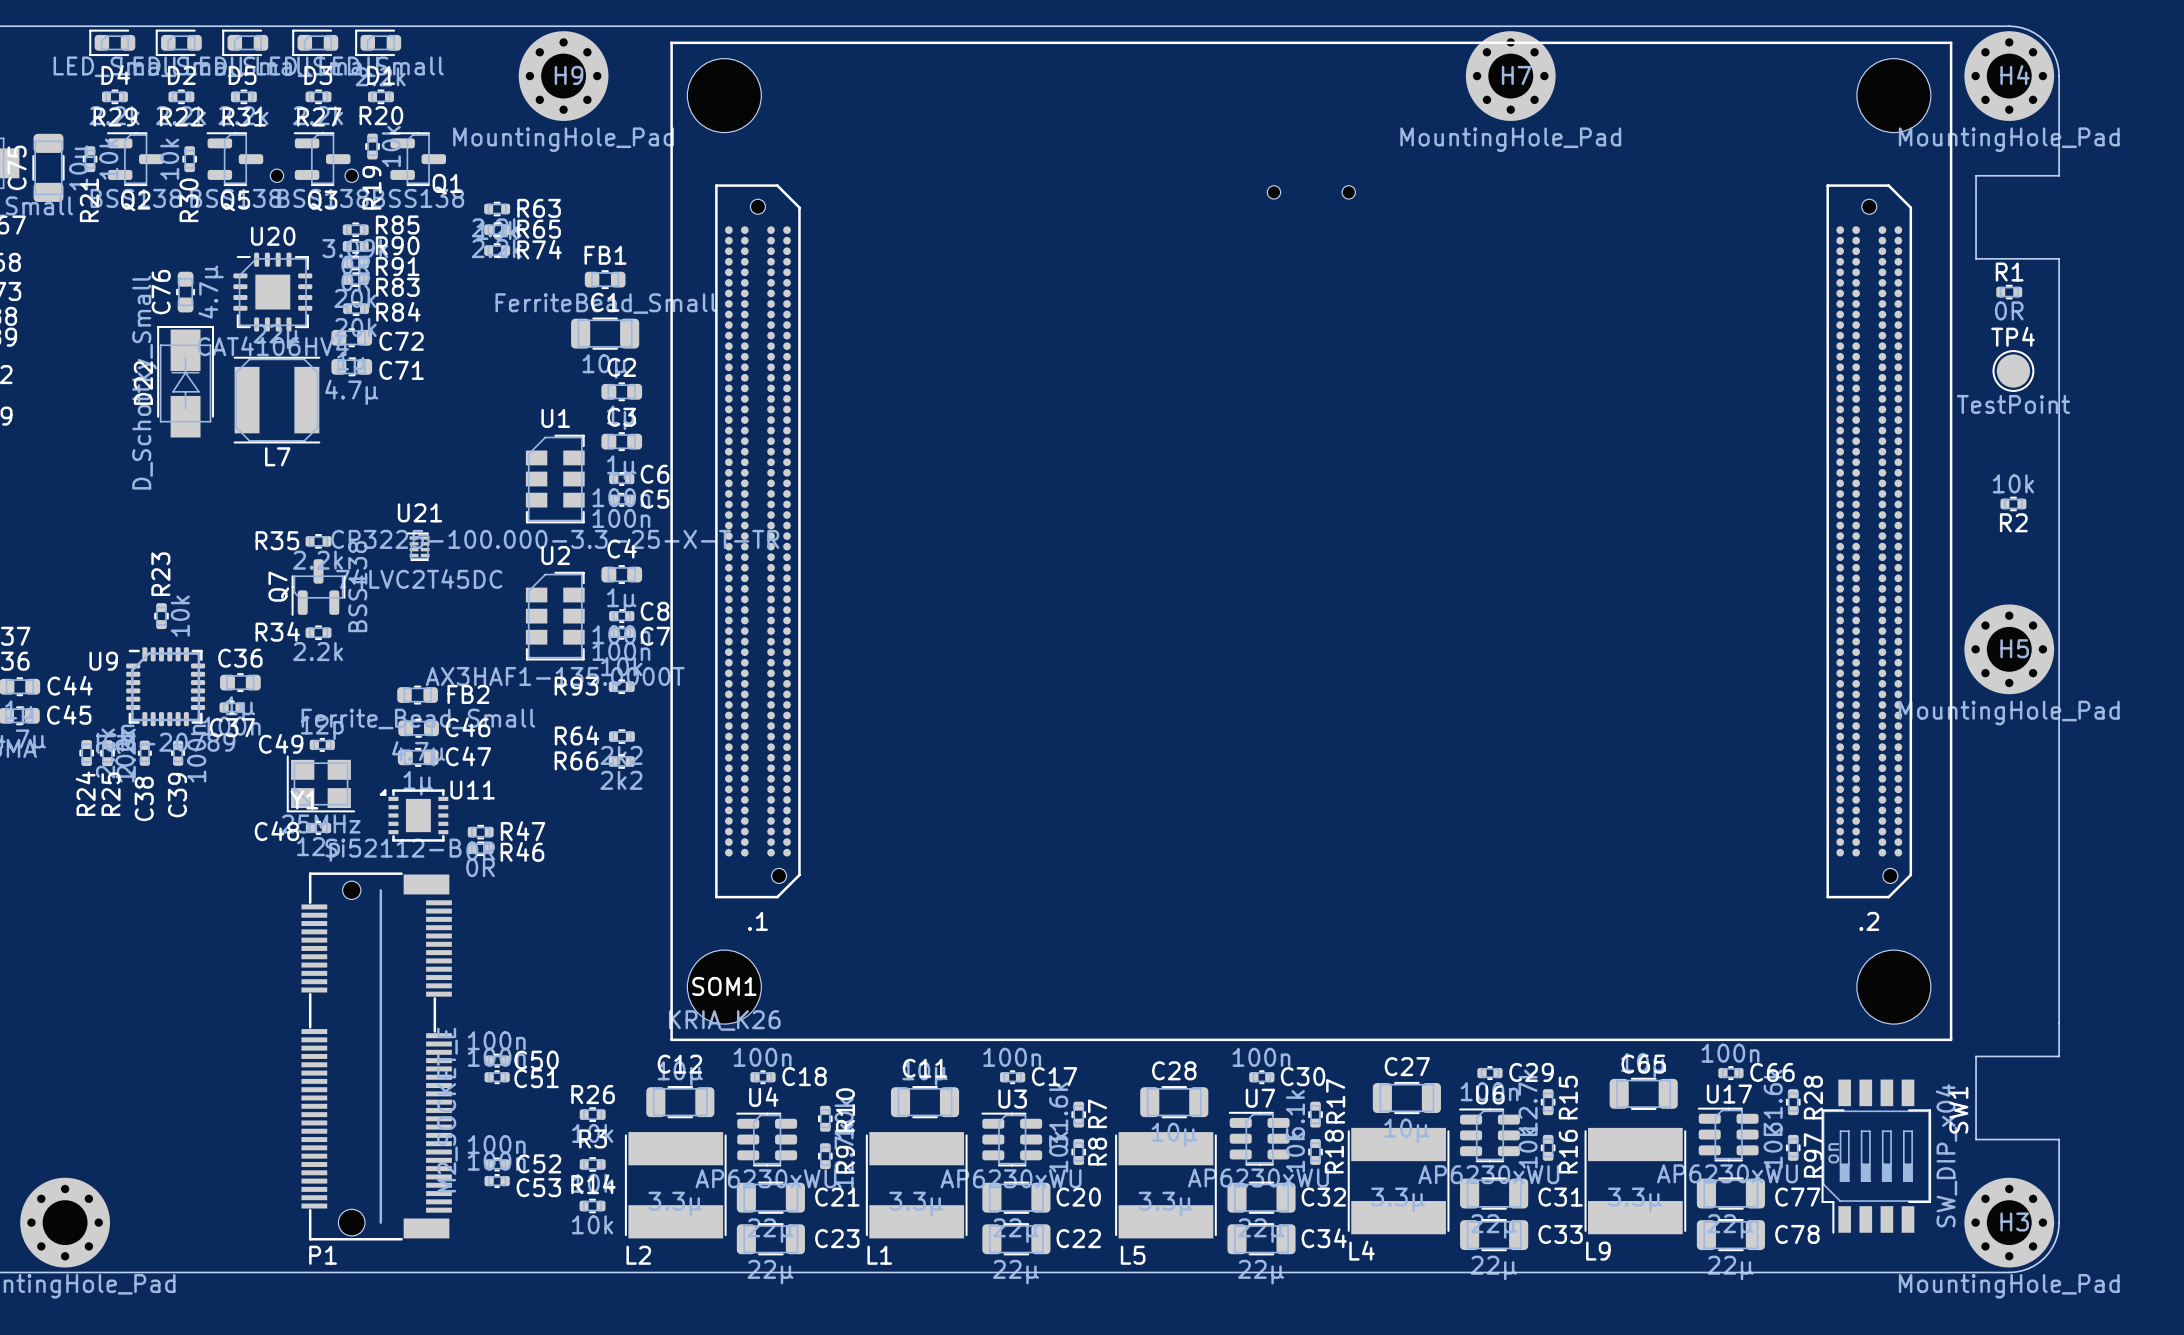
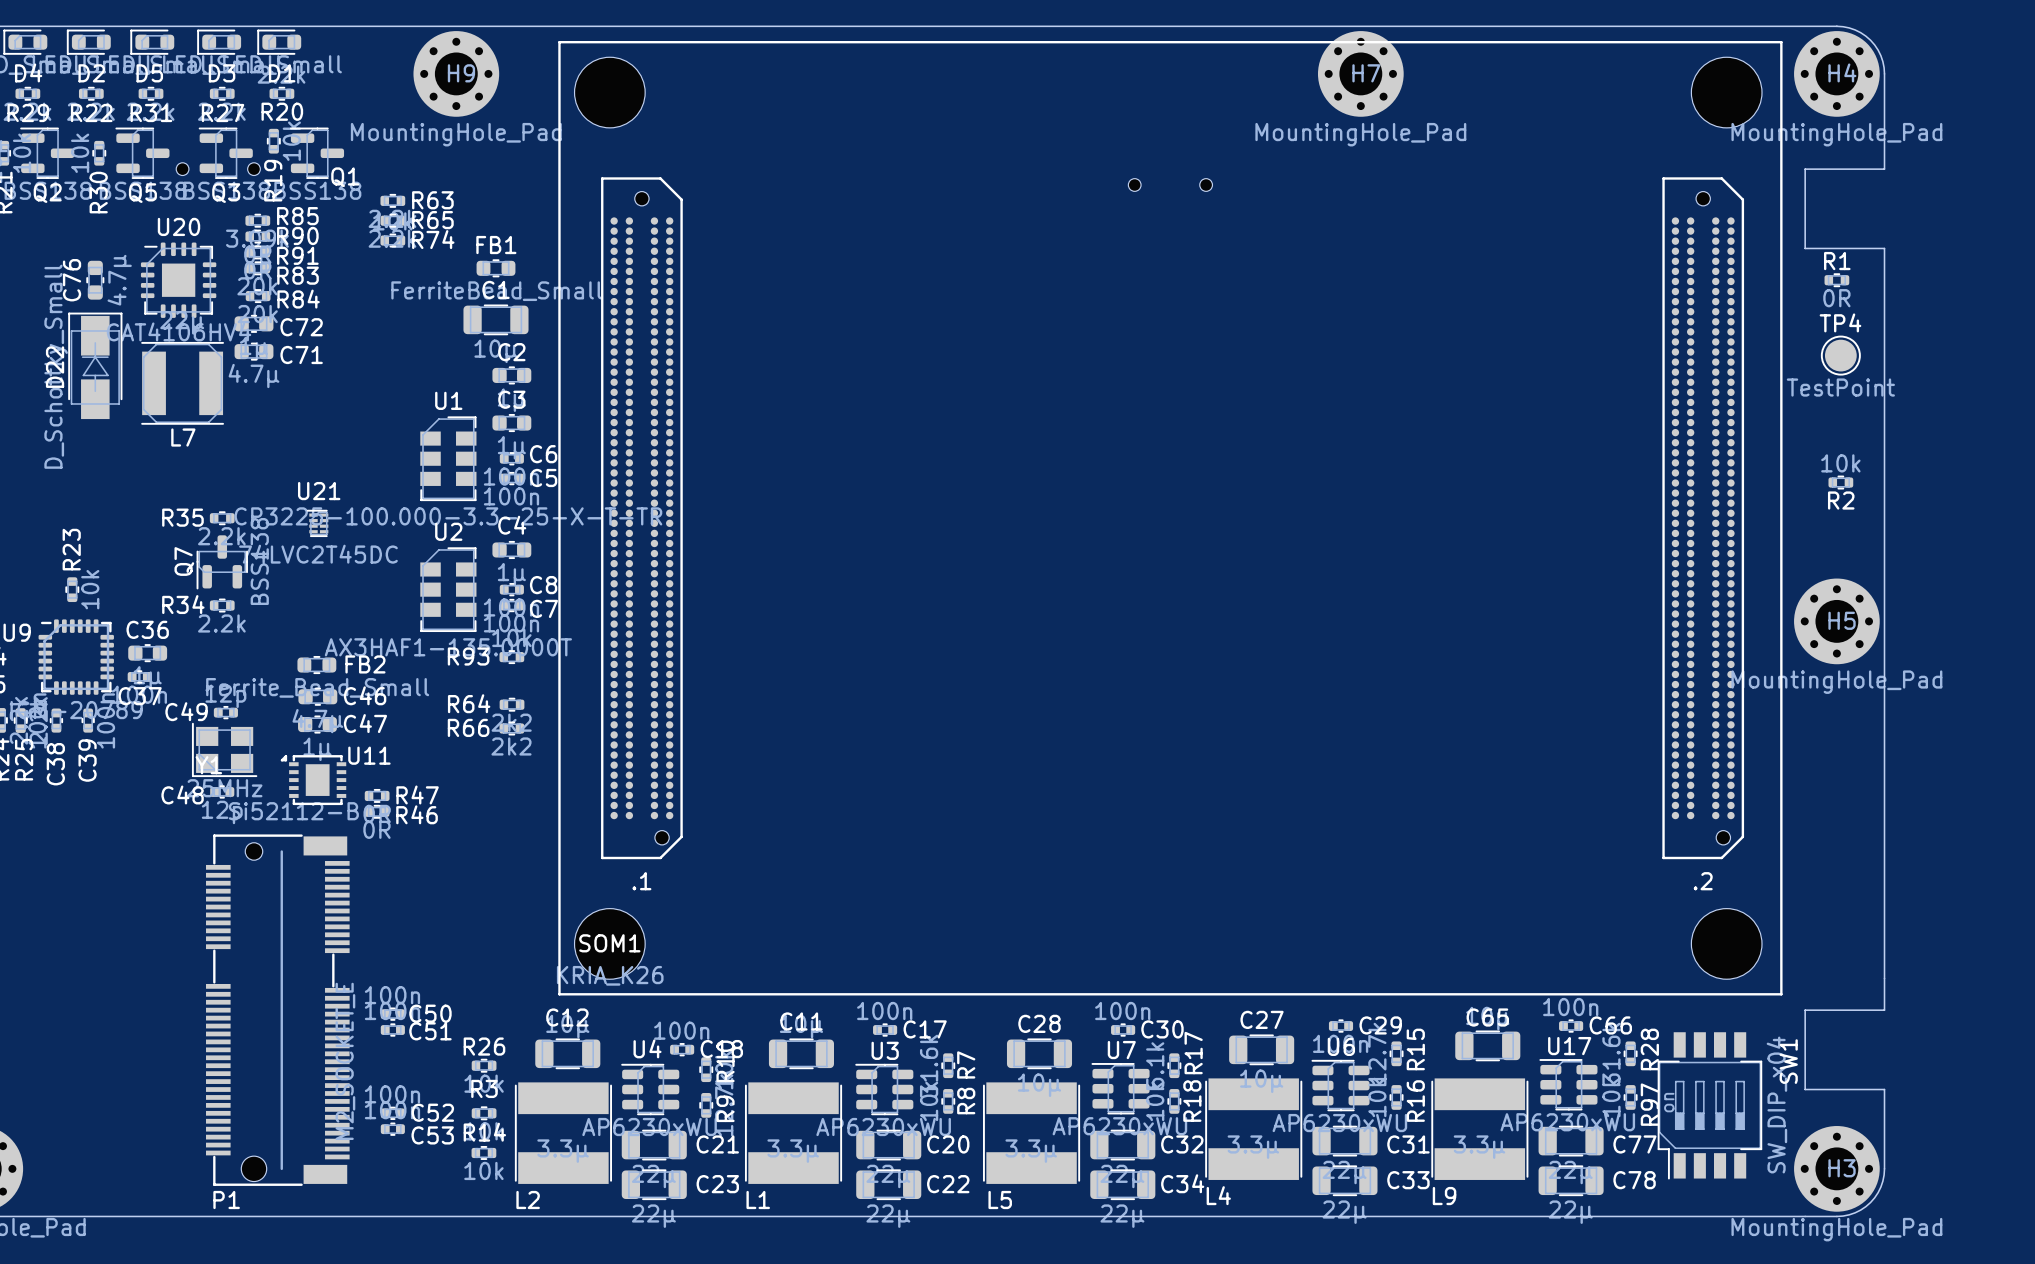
C18 position: (763, 1077) -> (682, 1049)

